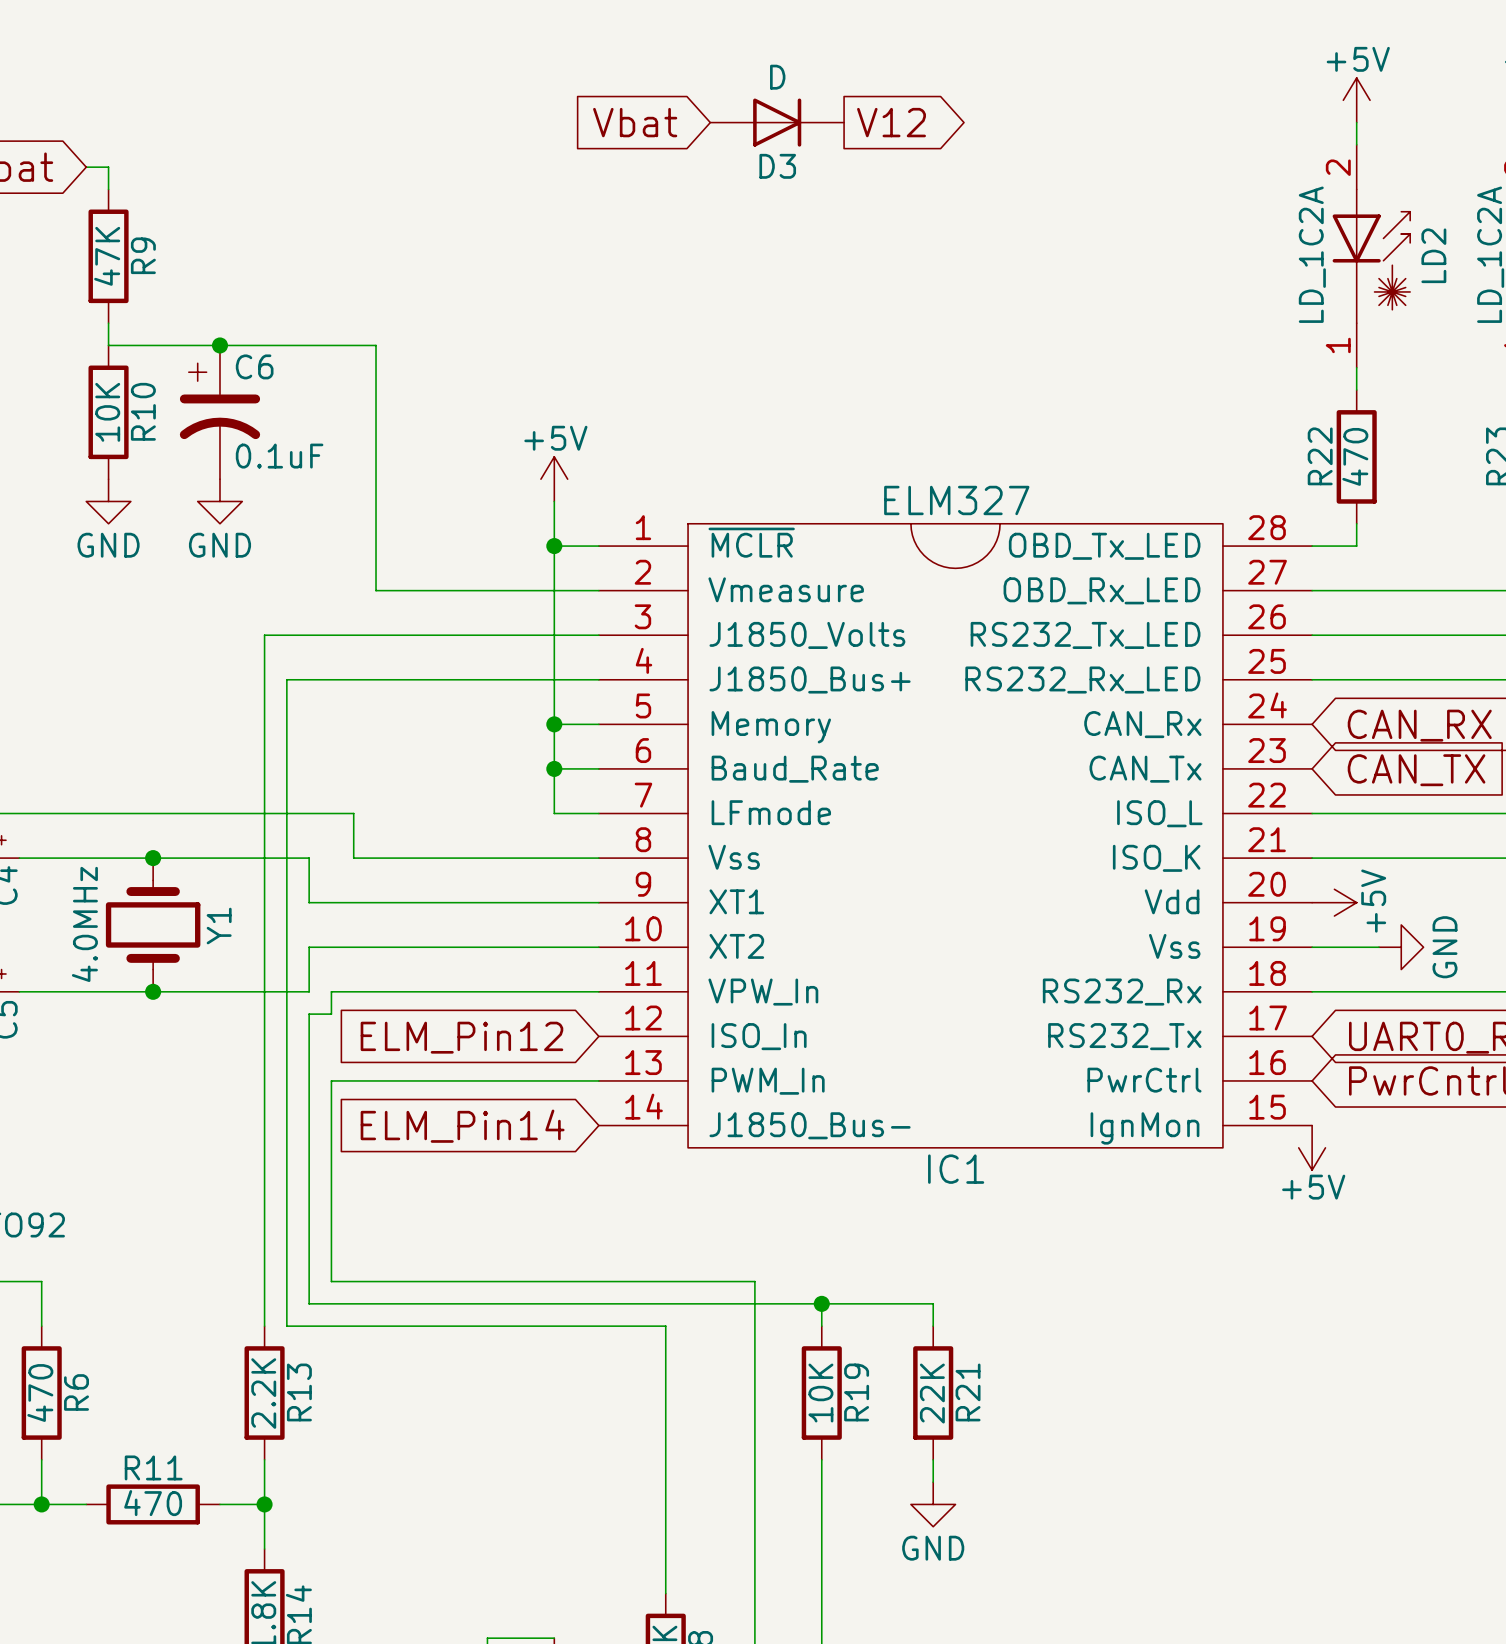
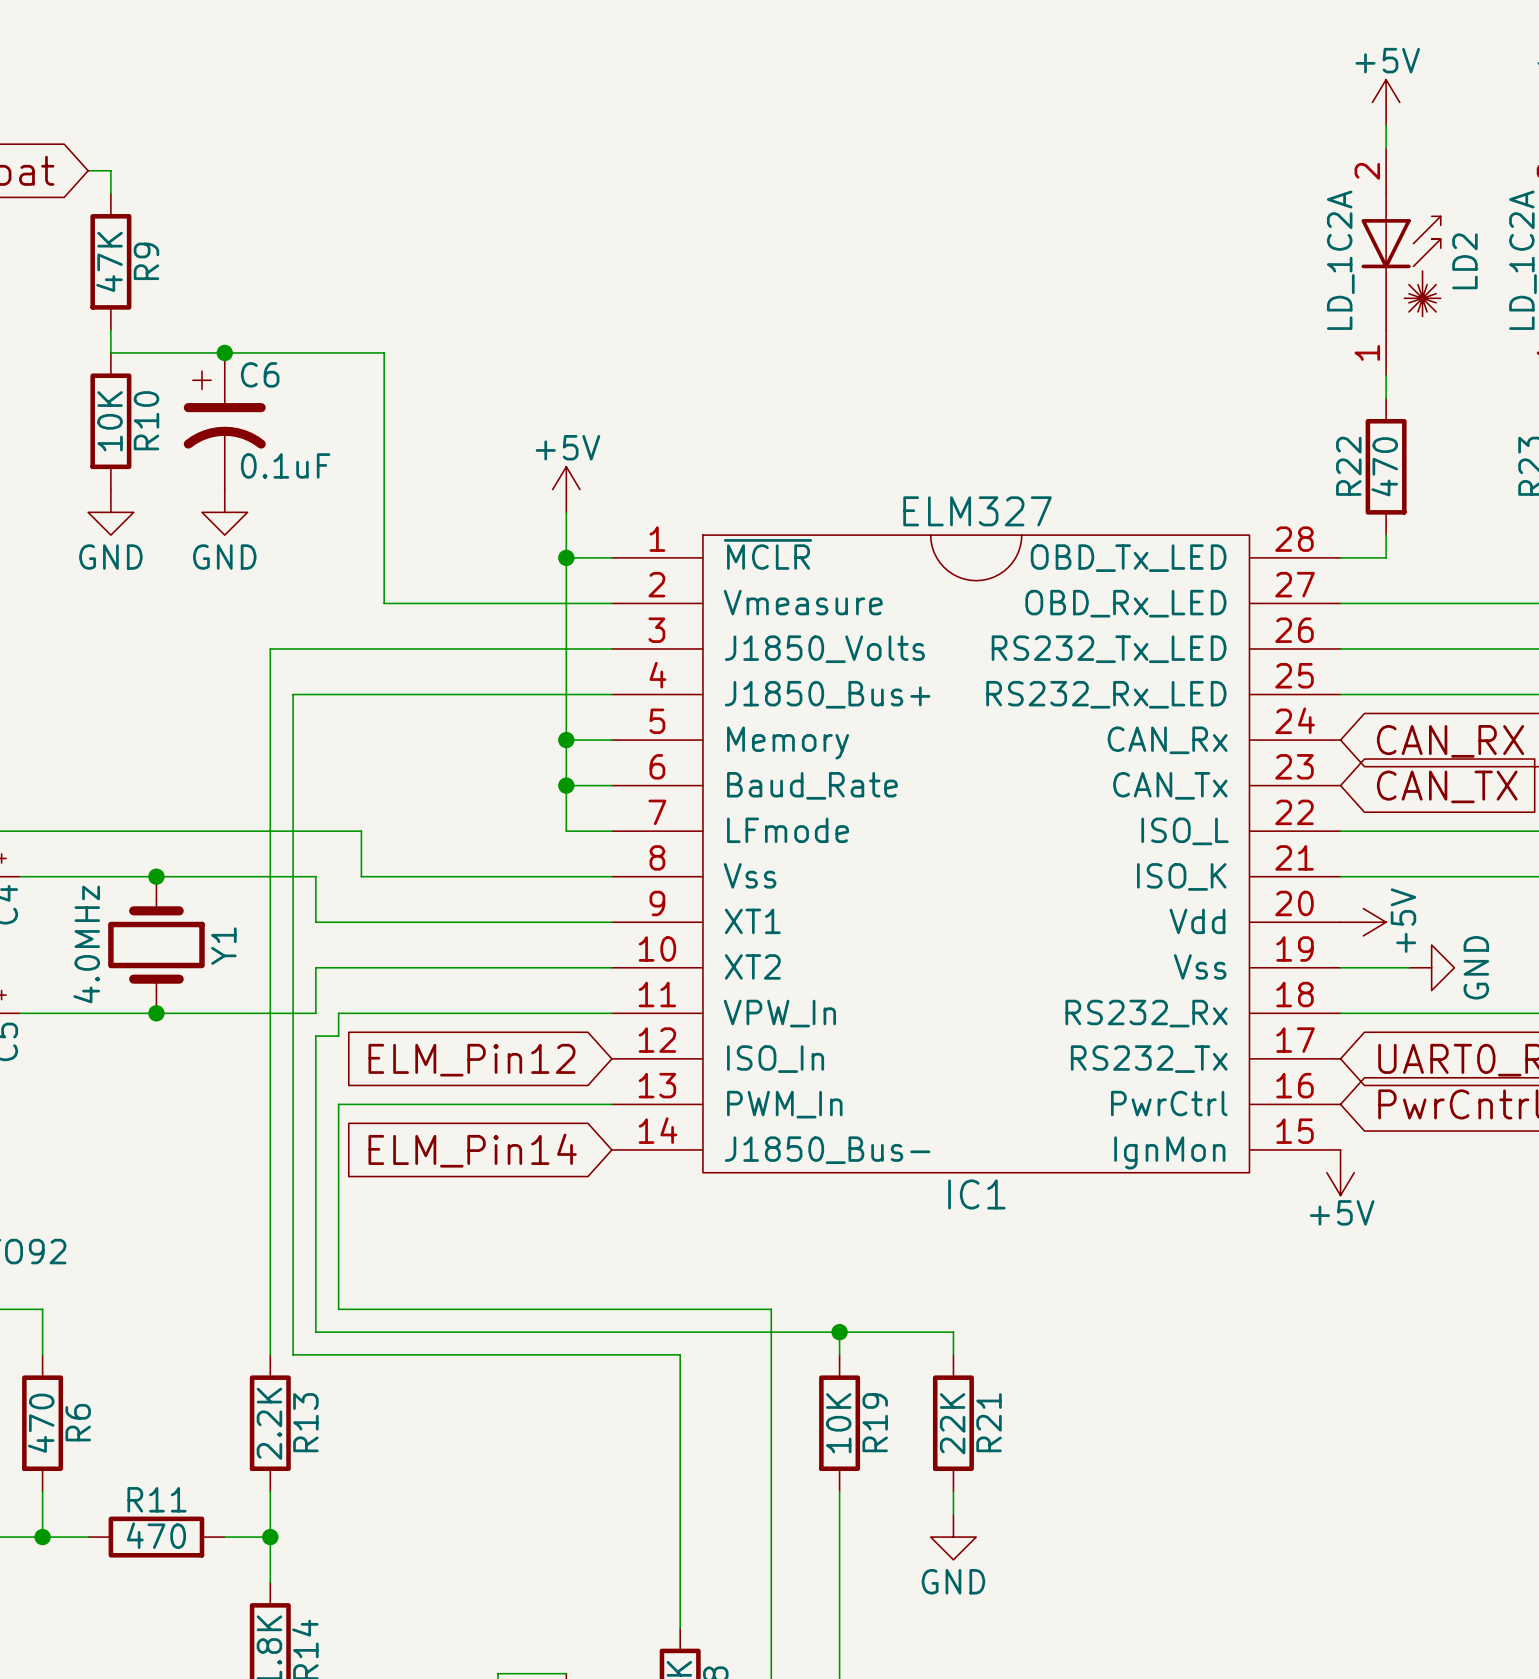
global label: Vbat (635, 122) -> none
D3: D (777, 122) -> none
global label: V12 (891, 122) -> none

